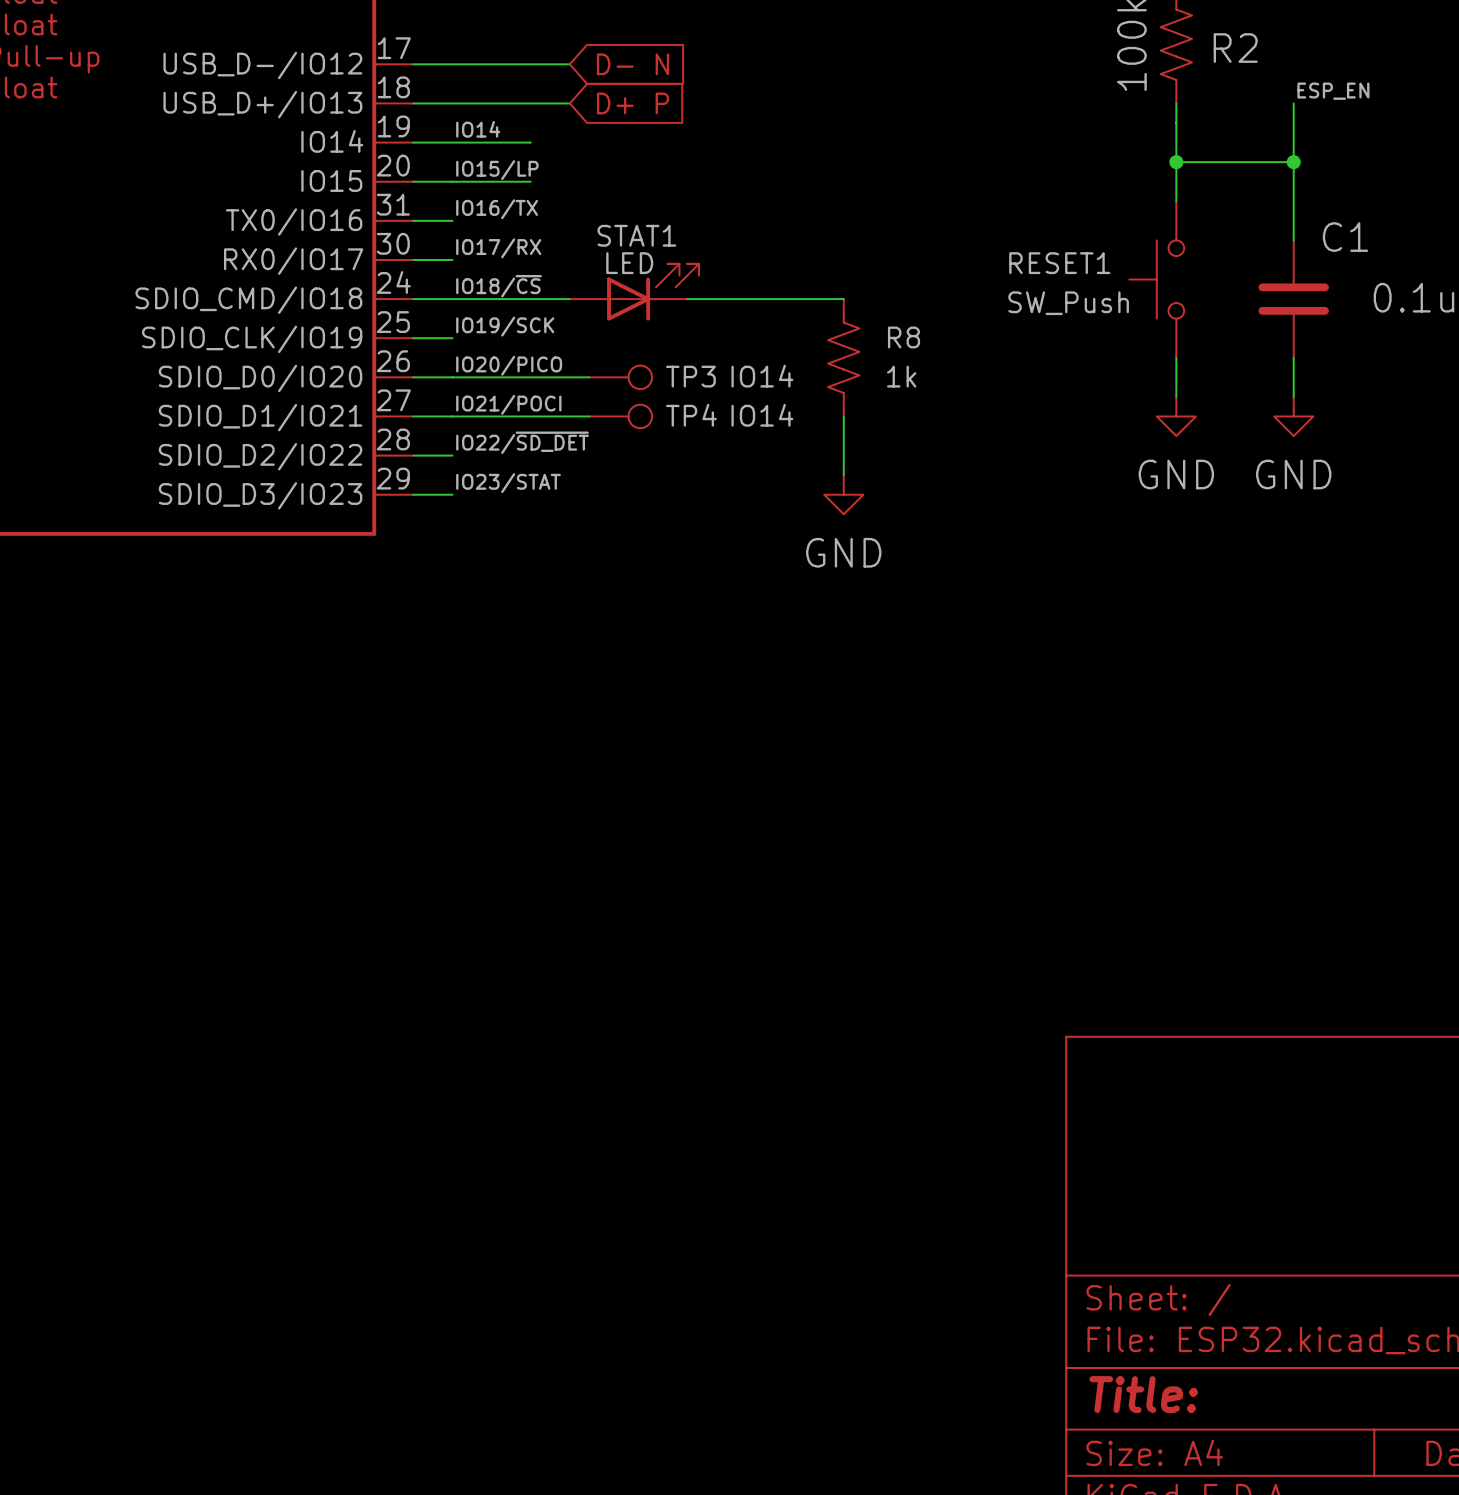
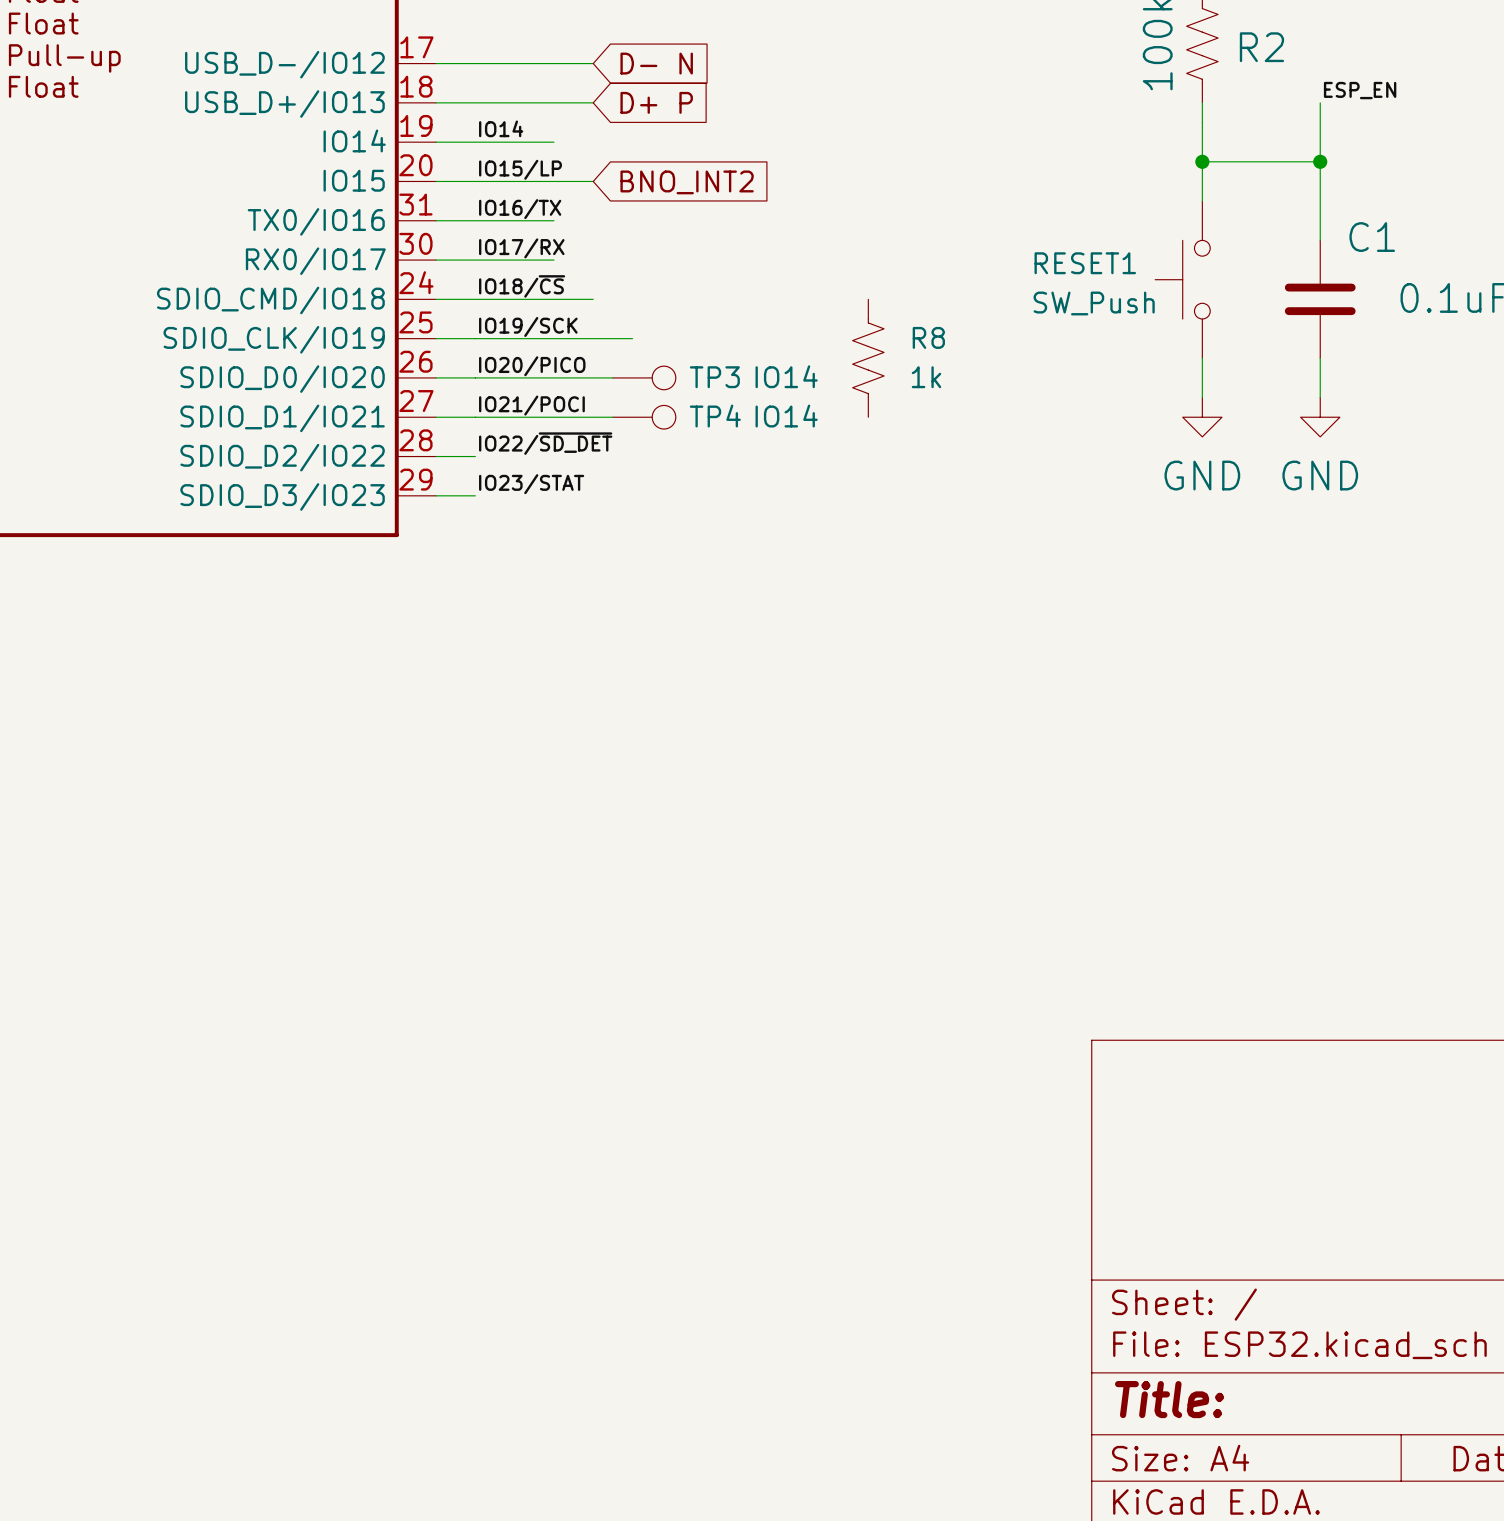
wire: none -> (553, 181) (593, 181)
global label: none -> BNO_INT2 (687, 182)
wire: none -> (475, 220) (553, 220)
wire: none -> (475, 260) (553, 260)
STAT1: LED (634, 292) -> none
wire: (687, 299) (843, 299) -> (475, 338) (632, 338)
wire: (843, 416) (843, 475) -> none
power symbol: GND (843, 494) -> none

